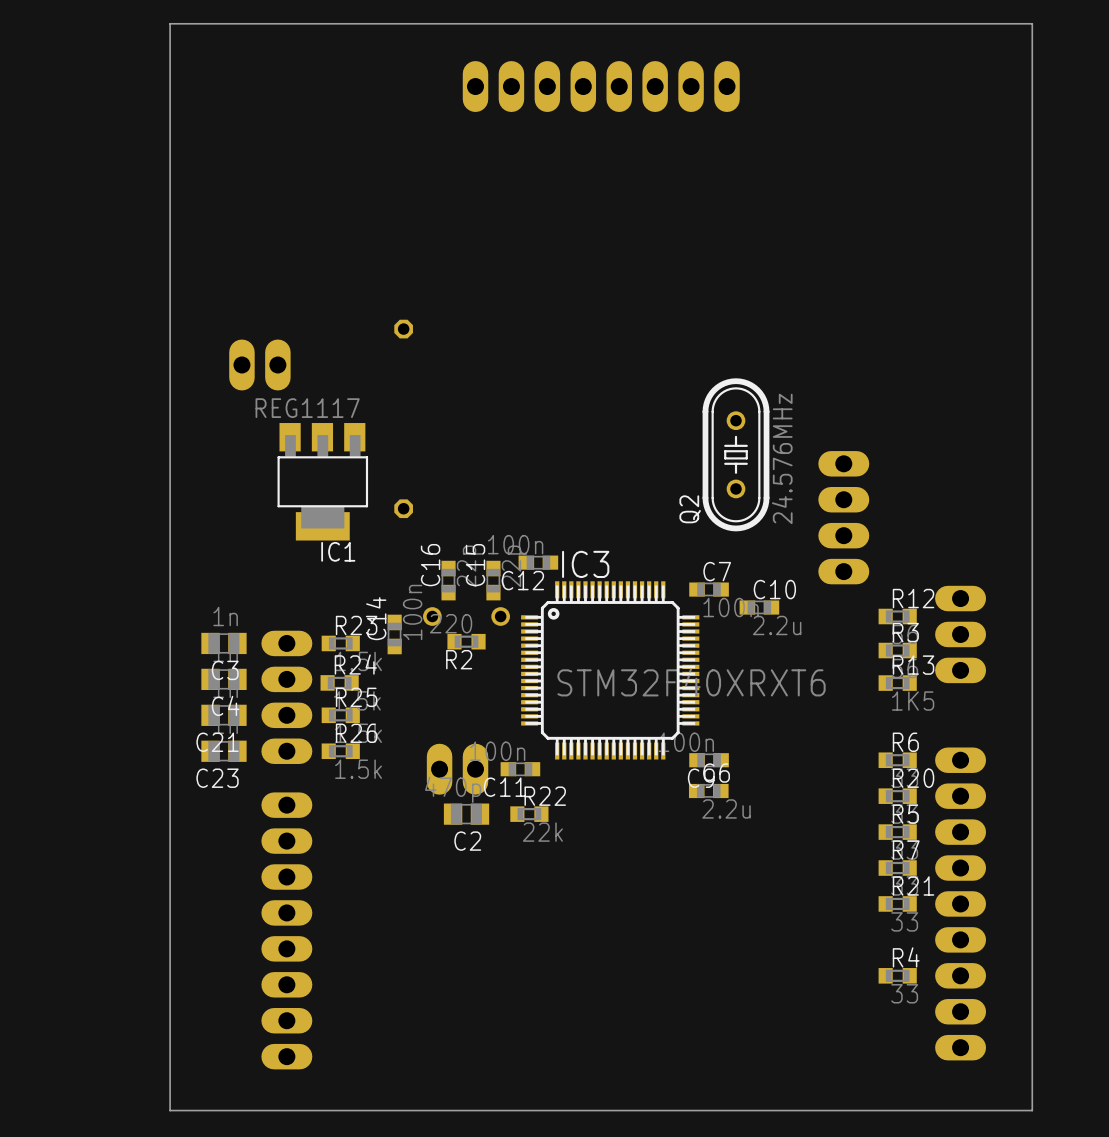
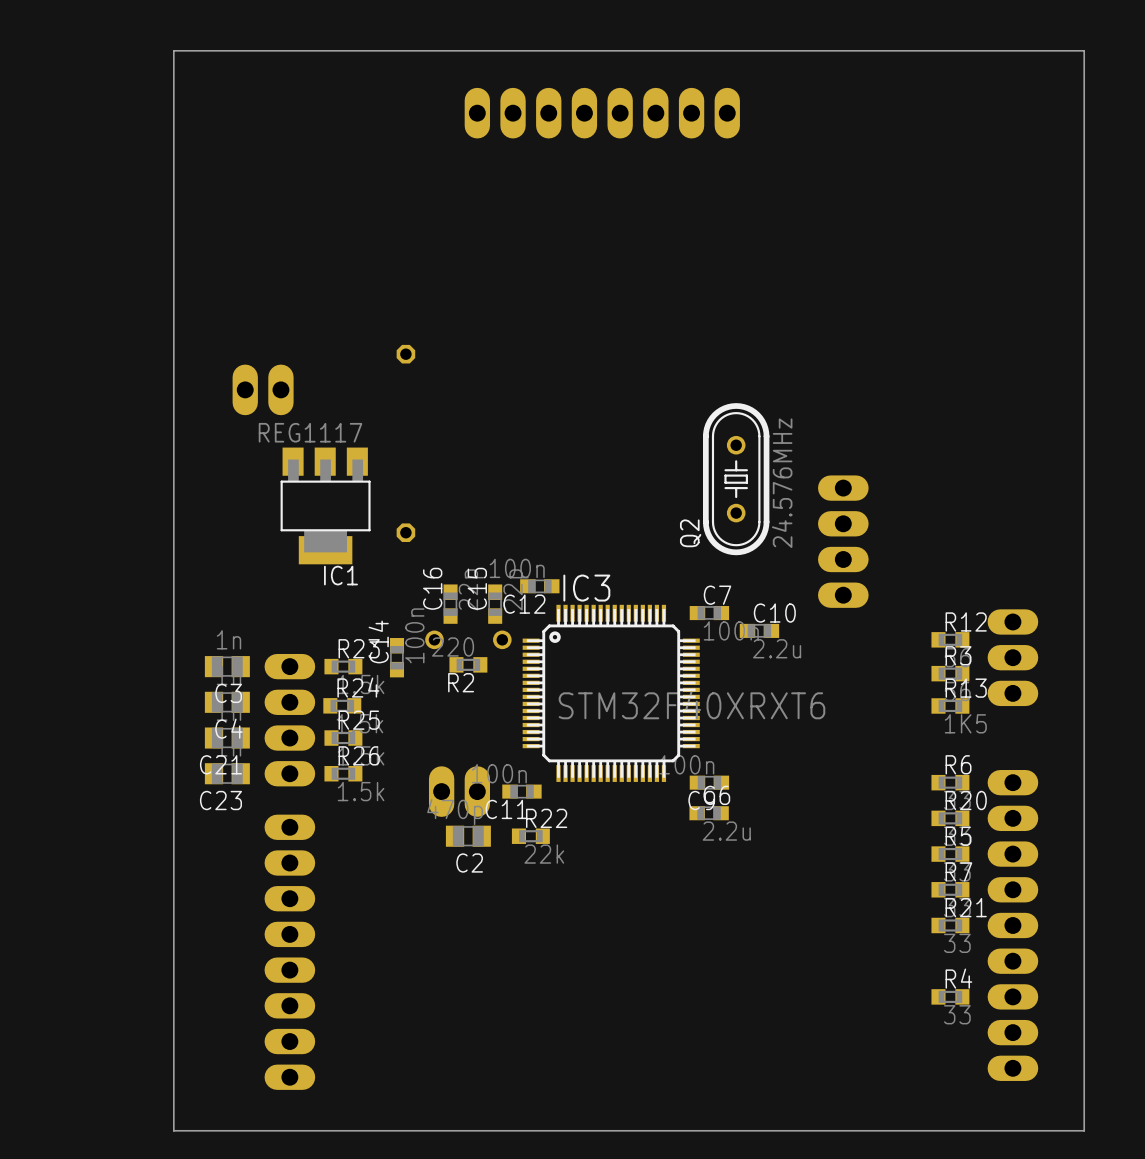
board edge: (1032, 23) (1032, 1110) -> (1030, 50) (1084, 50) (1084, 1130) (1030, 1130)
R12 position: (897, 616) -> (950, 639)
part position: (960, 634) -> (1012, 657)
R3 position: (897, 650) -> (950, 673)
R13 position: (897, 683) -> (950, 705)
R6 position: (897, 760) -> (950, 782)
R20 position: (897, 796) -> (950, 818)
R5 position: (897, 832) -> (950, 854)
R7 position: (897, 868) -> (950, 889)
R21 position: (897, 903) -> (950, 925)
part position: (960, 903) -> (1012, 925)
R4 position: (897, 975) -> (950, 996)

